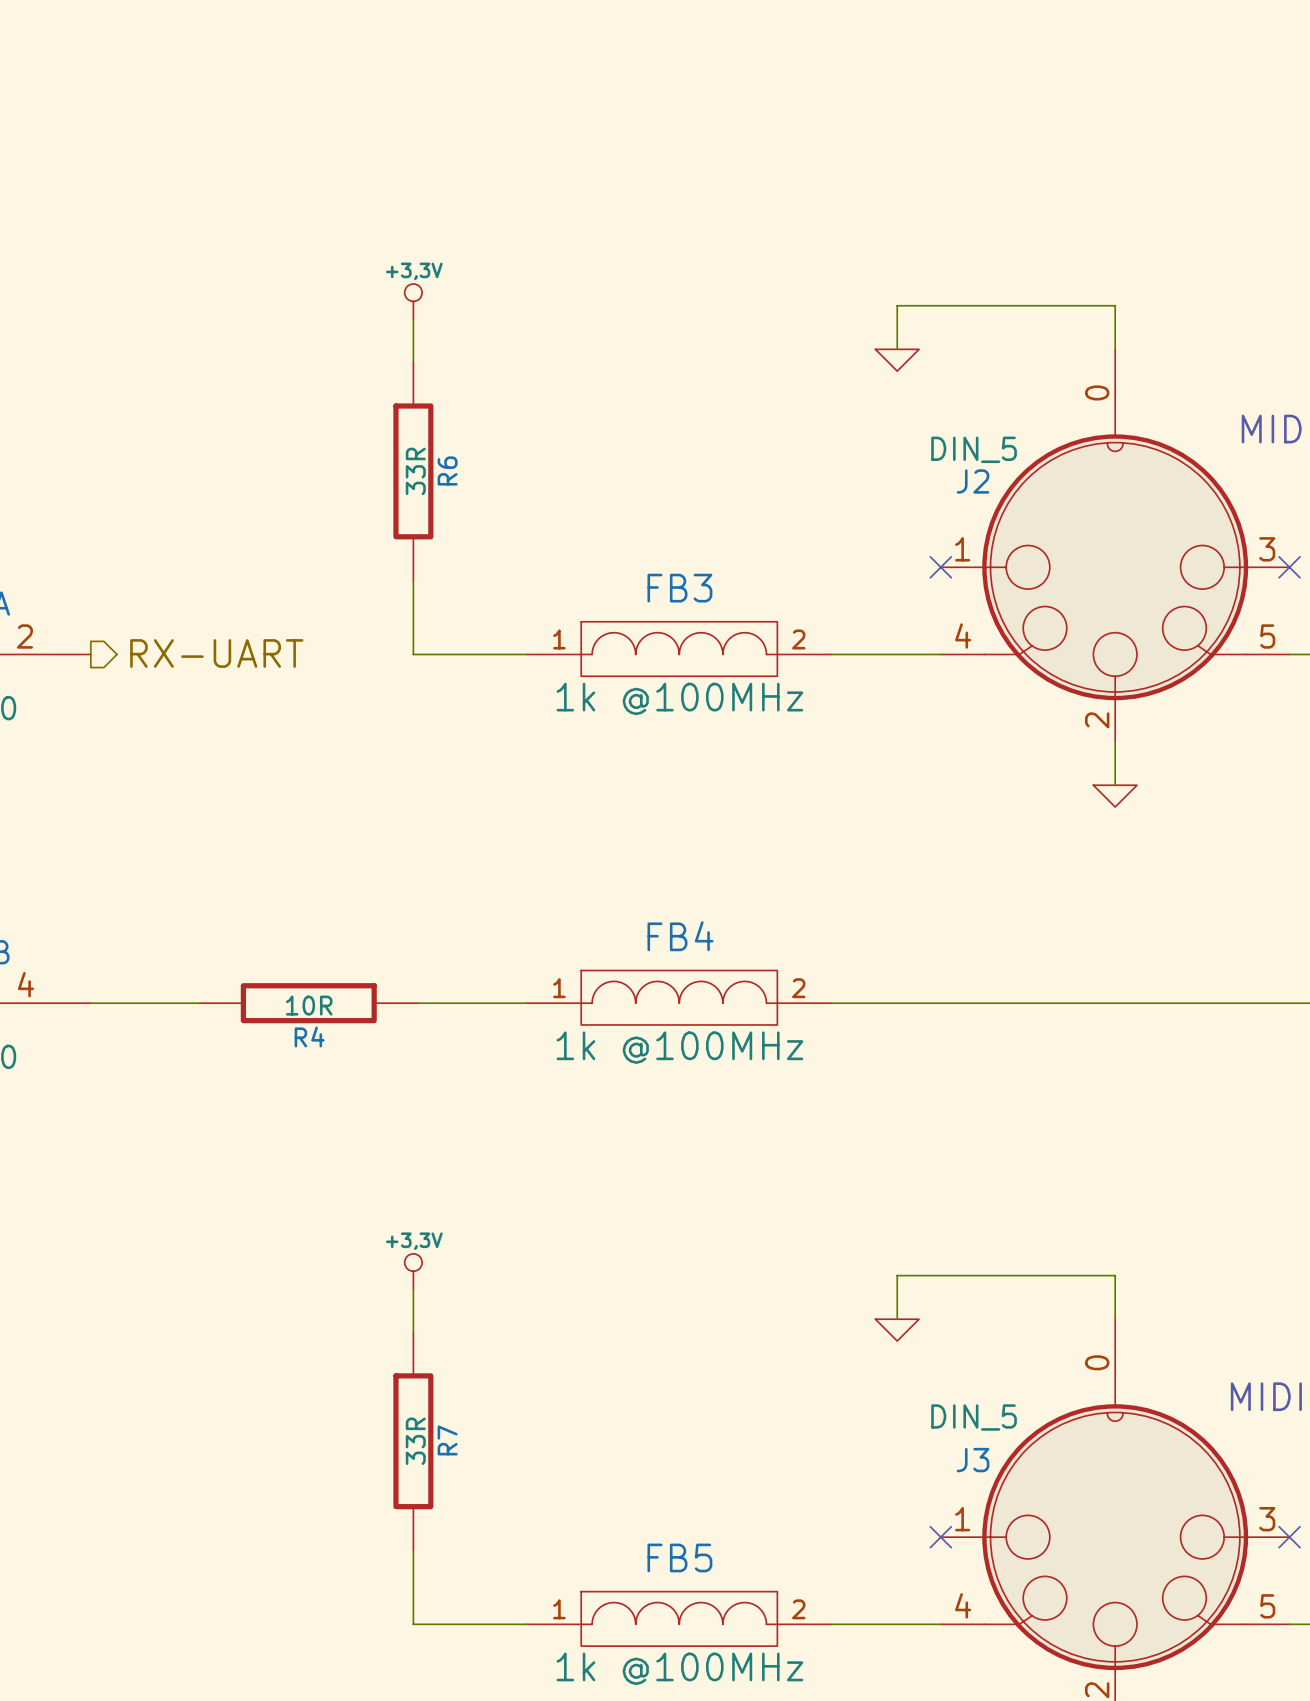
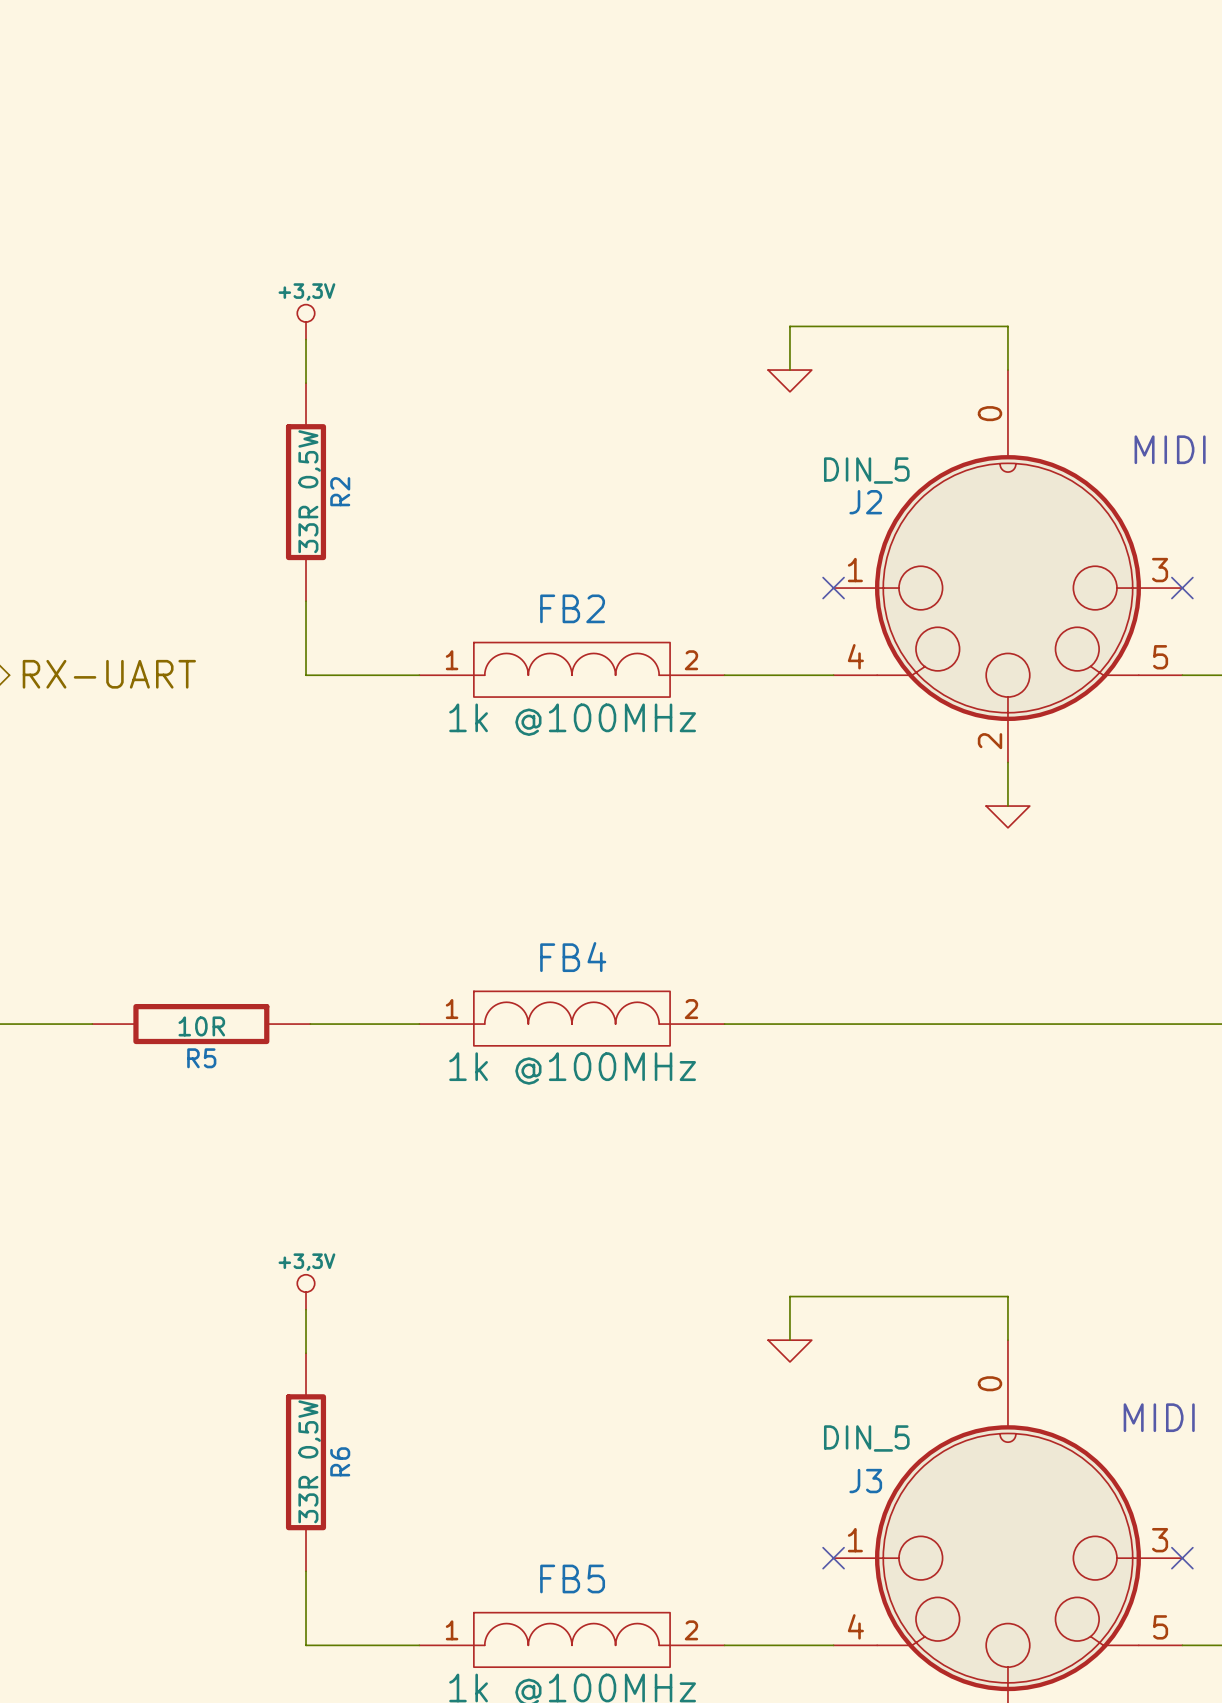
R6 name: R6 (447, 470) -> R2 (340, 491)
R6 value: 33R (415, 471) -> 33R 0,5W (309, 491)
FB3 name: FB3 (679, 588) -> FB2 (572, 608)
R4 name: R4 (309, 1036) -> R5 (201, 1058)
R7 name: R7 (447, 1440) -> R6 (340, 1461)
R7 value: 33R (415, 1441) -> 33R 0,5W (309, 1461)

